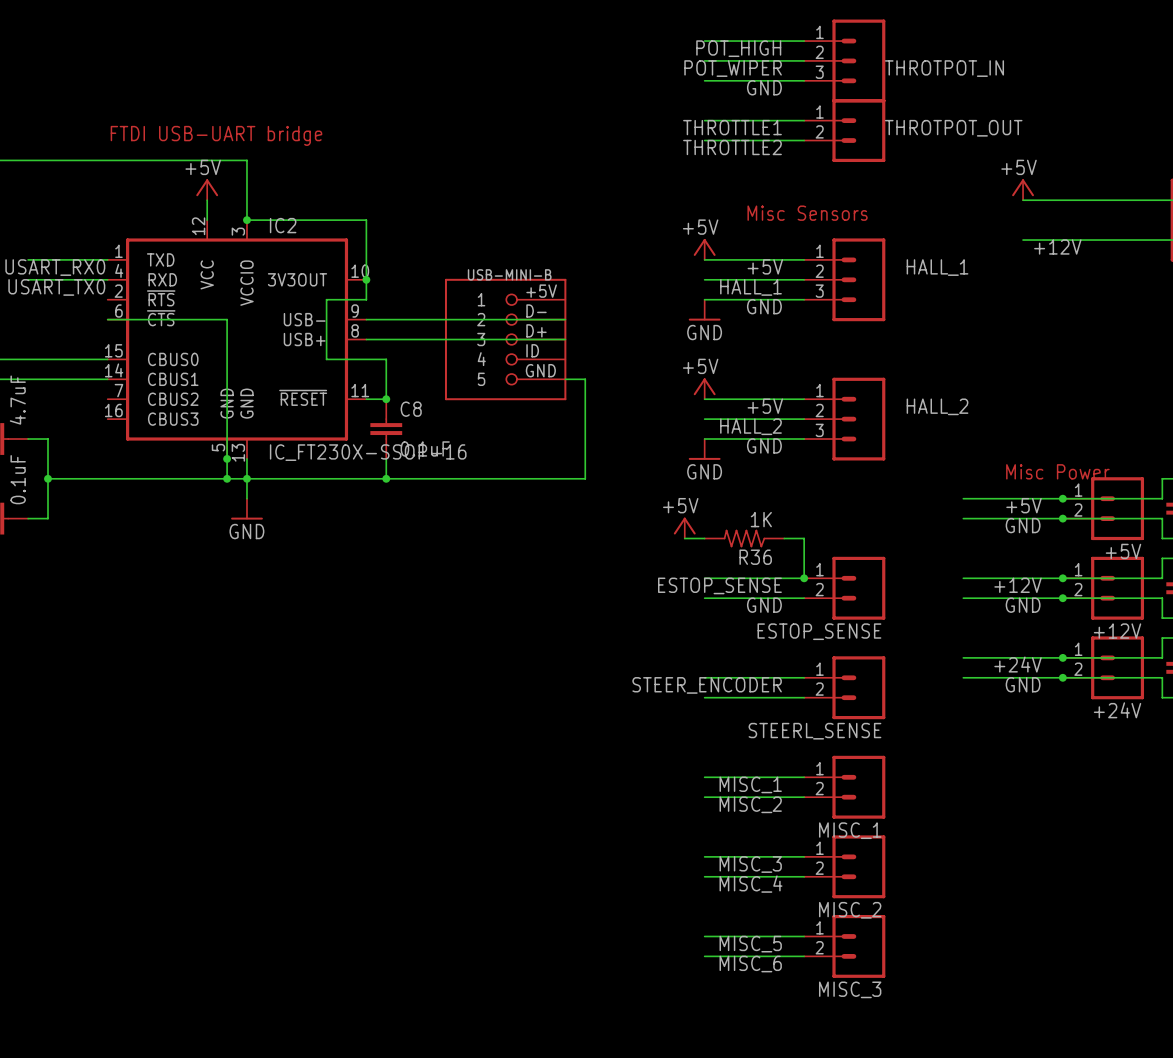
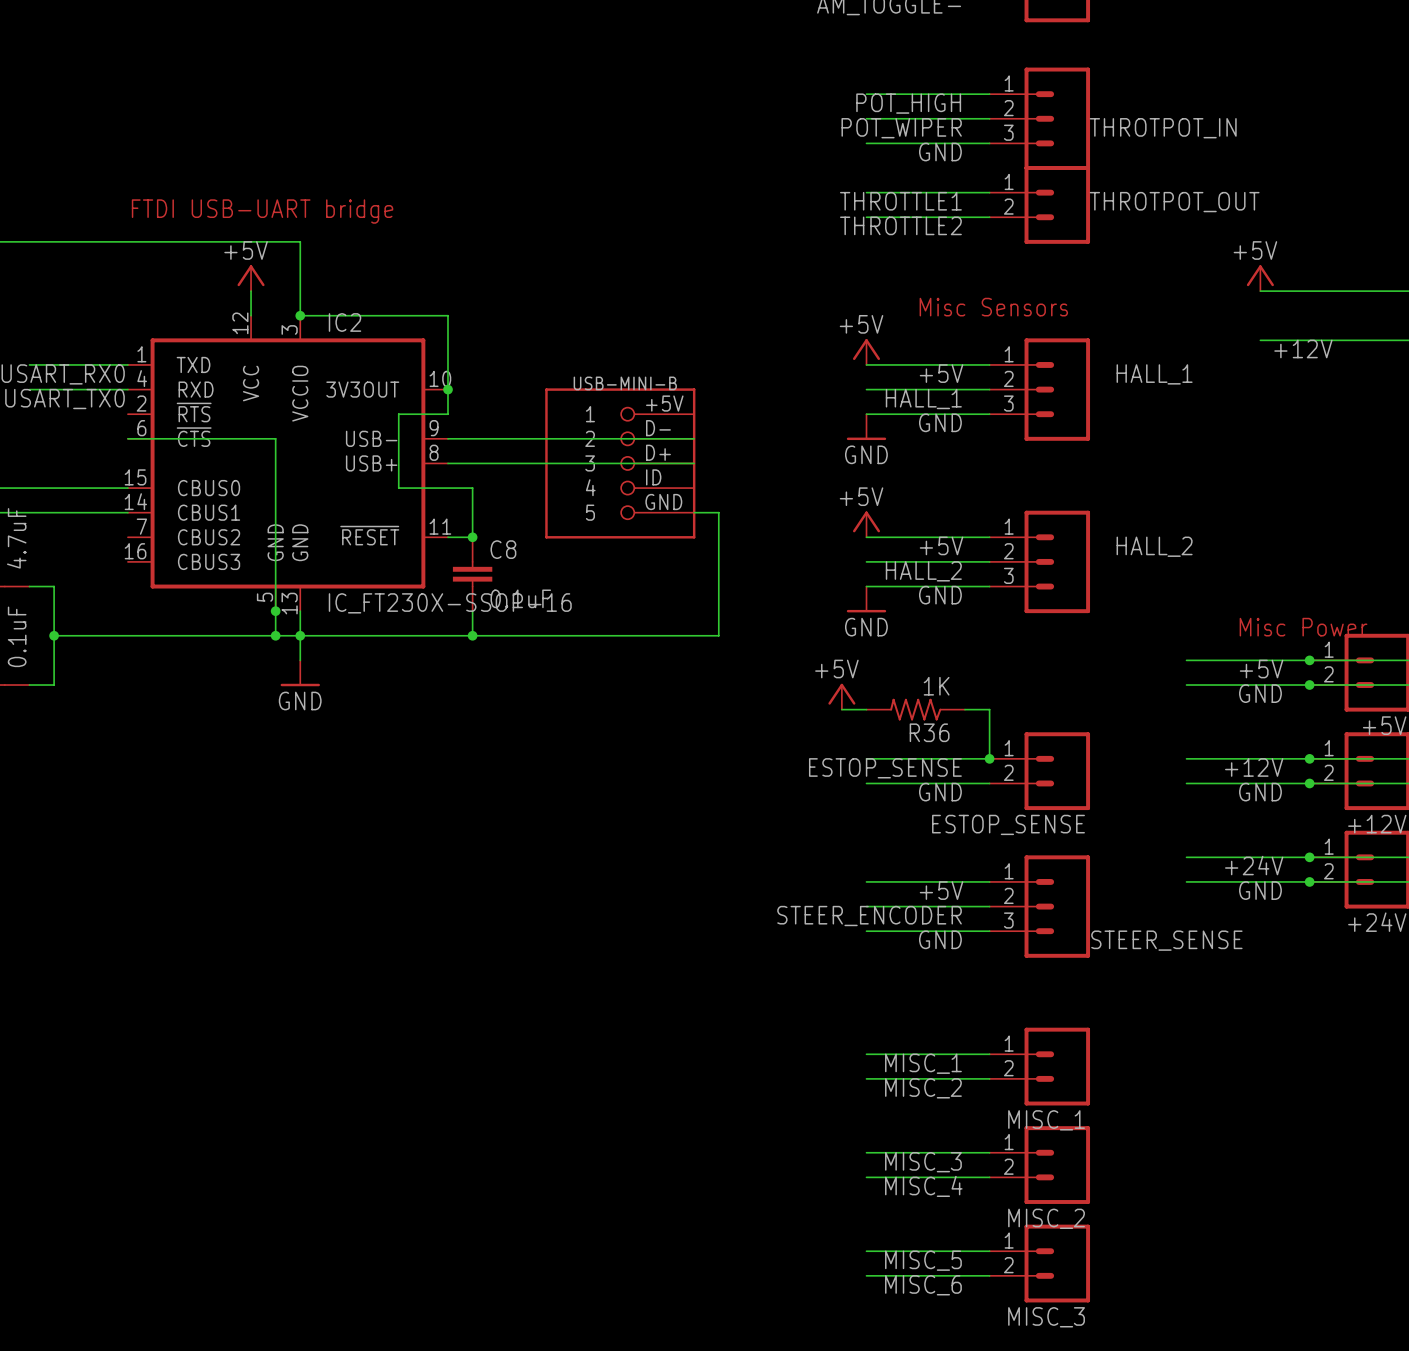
label: STEER_ENCODER (707, 685) -> +5V (941, 890)
STEERL_SENSE: (844, 687) -> none
STEER_SENSE: none -> (1039, 906)
label: none -> STEER_ENCODER (869, 916)
wire: none -> (866, 931) (989, 931)
label: none -> GND (940, 939)
wire: (704, 777) (804, 777) -> (866, 1054) (989, 1054)
label position: MISC_1 (750, 784) -> MISC_1 (923, 1063)
MISC_1 position: (844, 787) -> (1039, 1066)
wire: (704, 797) (804, 797) -> (866, 1078) (989, 1078)
label position: MISC_2 (750, 804) -> MISC_2 (923, 1088)
wire: (704, 856) (804, 856) -> (866, 1152) (989, 1152)
label position: MISC_3 (750, 864) -> MISC_3 (923, 1162)
MISC_2 position: (844, 866) -> (1039, 1165)
wire: (704, 876) (804, 876) -> (866, 1177) (989, 1177)
label position: MISC_4 (750, 884) -> MISC_4 (923, 1186)
wire: (704, 936) (804, 936) -> (866, 1251) (989, 1251)
label position: MISC_5 (750, 944) -> MISC_5 (923, 1260)
MISC_3 position: (844, 946) -> (1039, 1263)
wire: (704, 956) (804, 956) -> (866, 1275) (989, 1275)
label position: MISC_6 (750, 964) -> MISC_6 (923, 1285)

